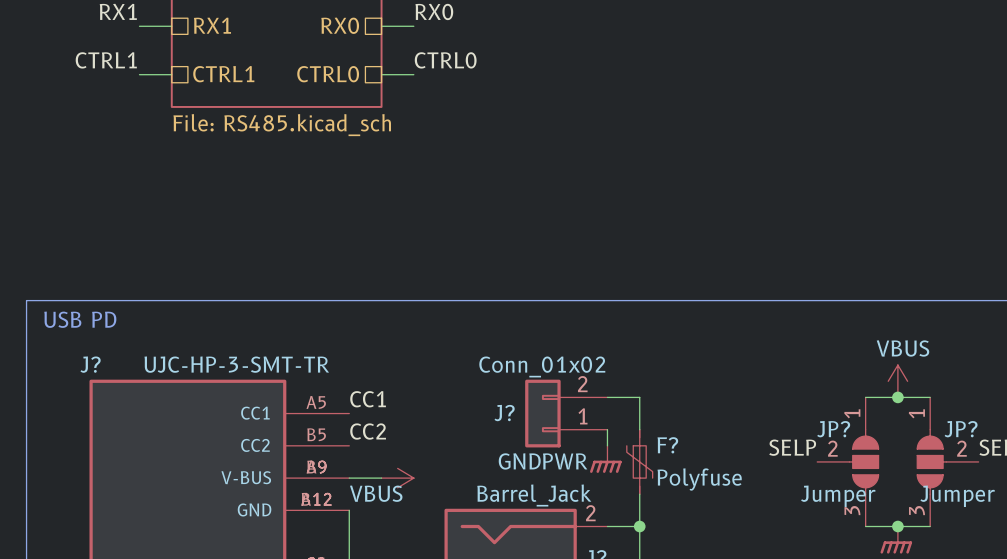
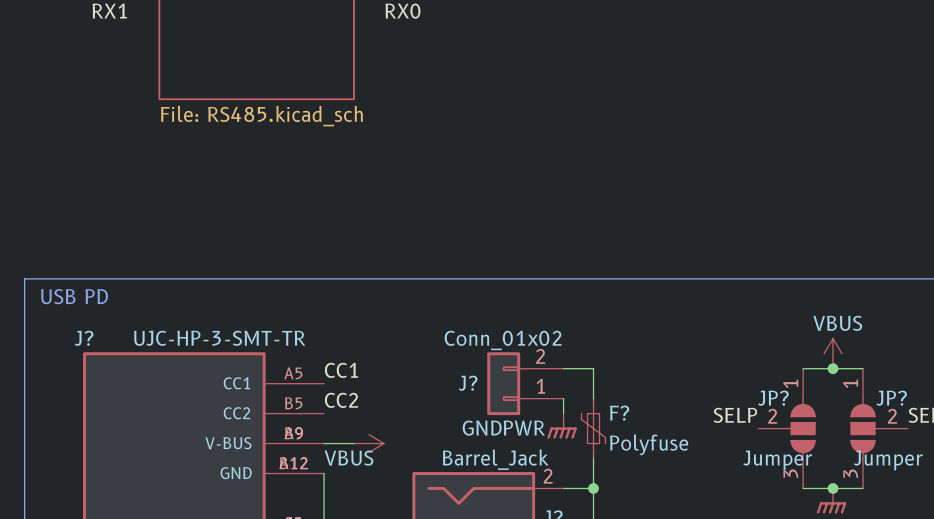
hierarchical label: RX1 (212, 25) -> none
hierarchical label: RX0 (340, 25) -> none
wire: (139, 26) (171, 26) -> none
wire: (381, 26) (413, 26) -> none
label: CTRL1 (106, 60) -> none
label: CTRL0 (445, 60) -> none
wire: (139, 74) (171, 74) -> none
hierarchical label: CTRL1 (223, 74) -> none
hierarchical label: CTRL0 (328, 74) -> none
wire: (381, 74) (413, 74) -> none

